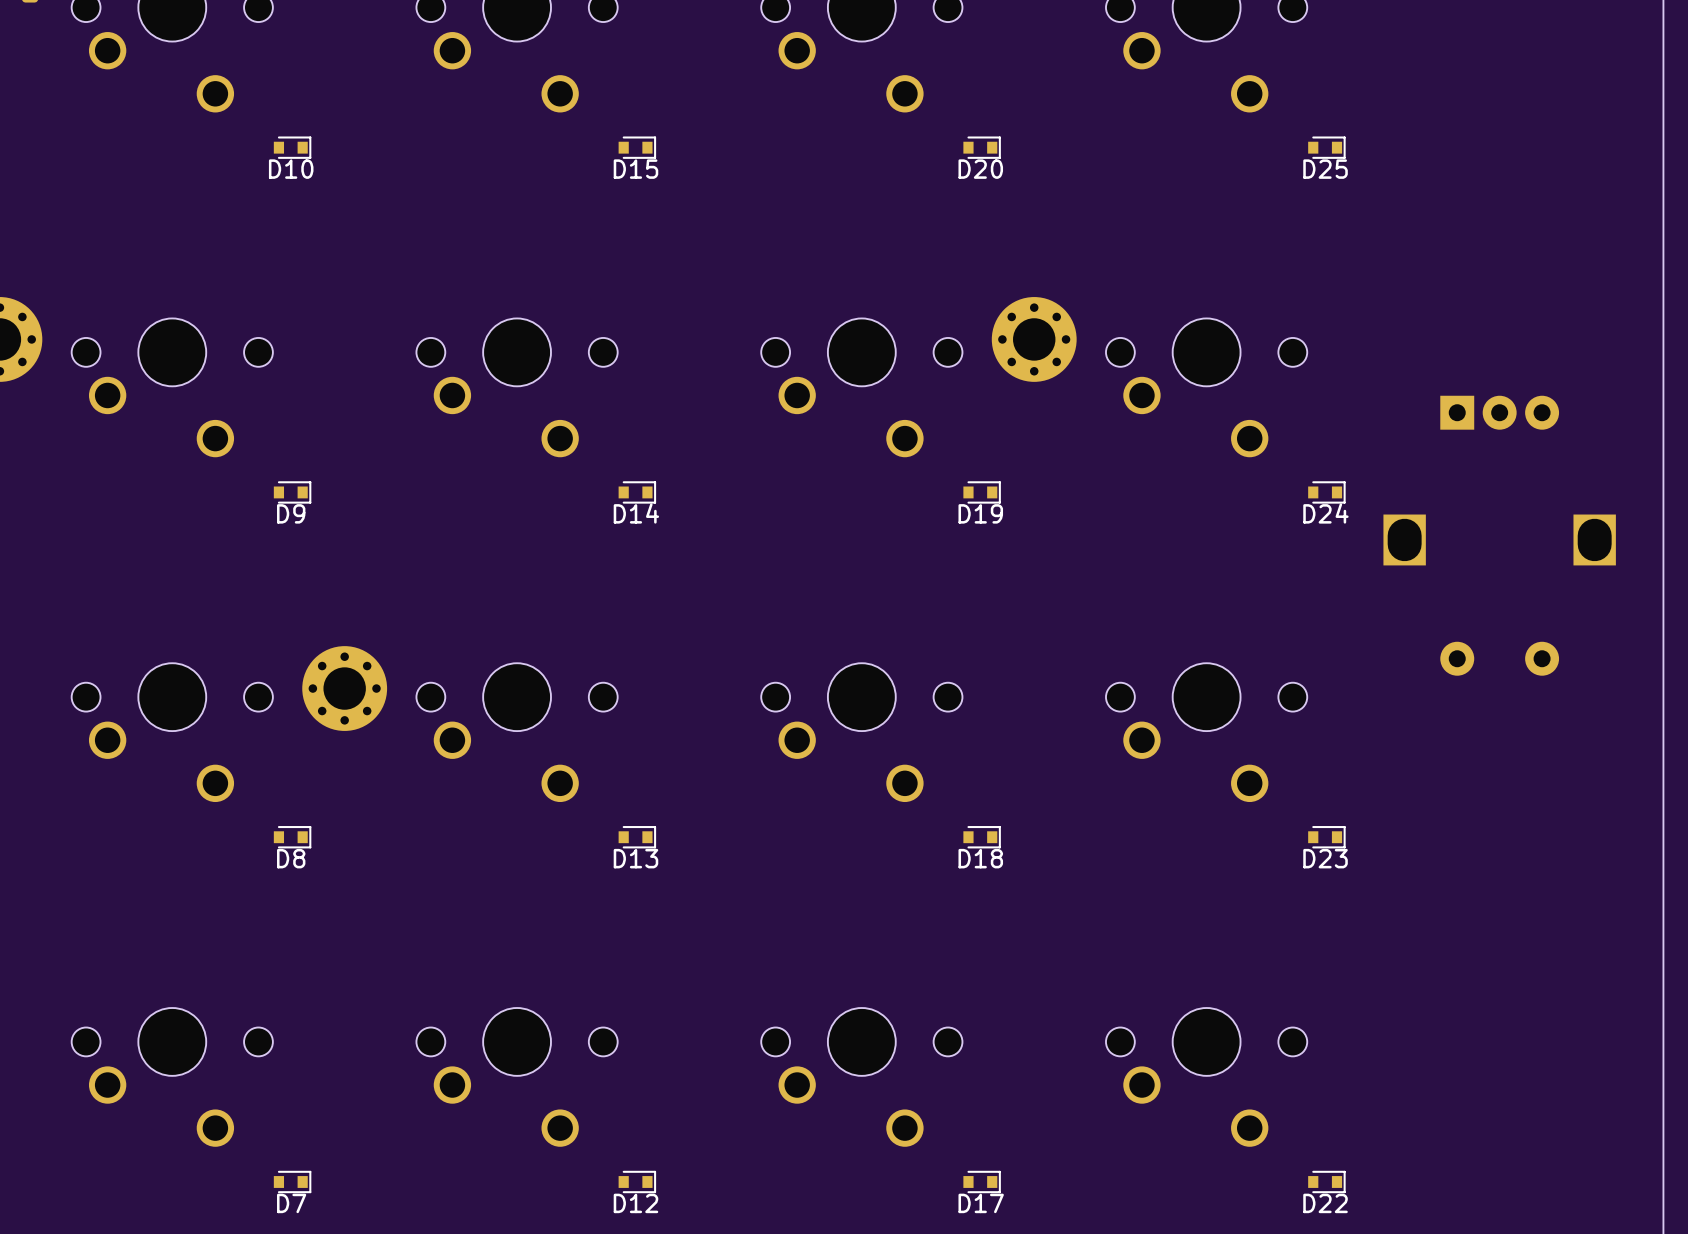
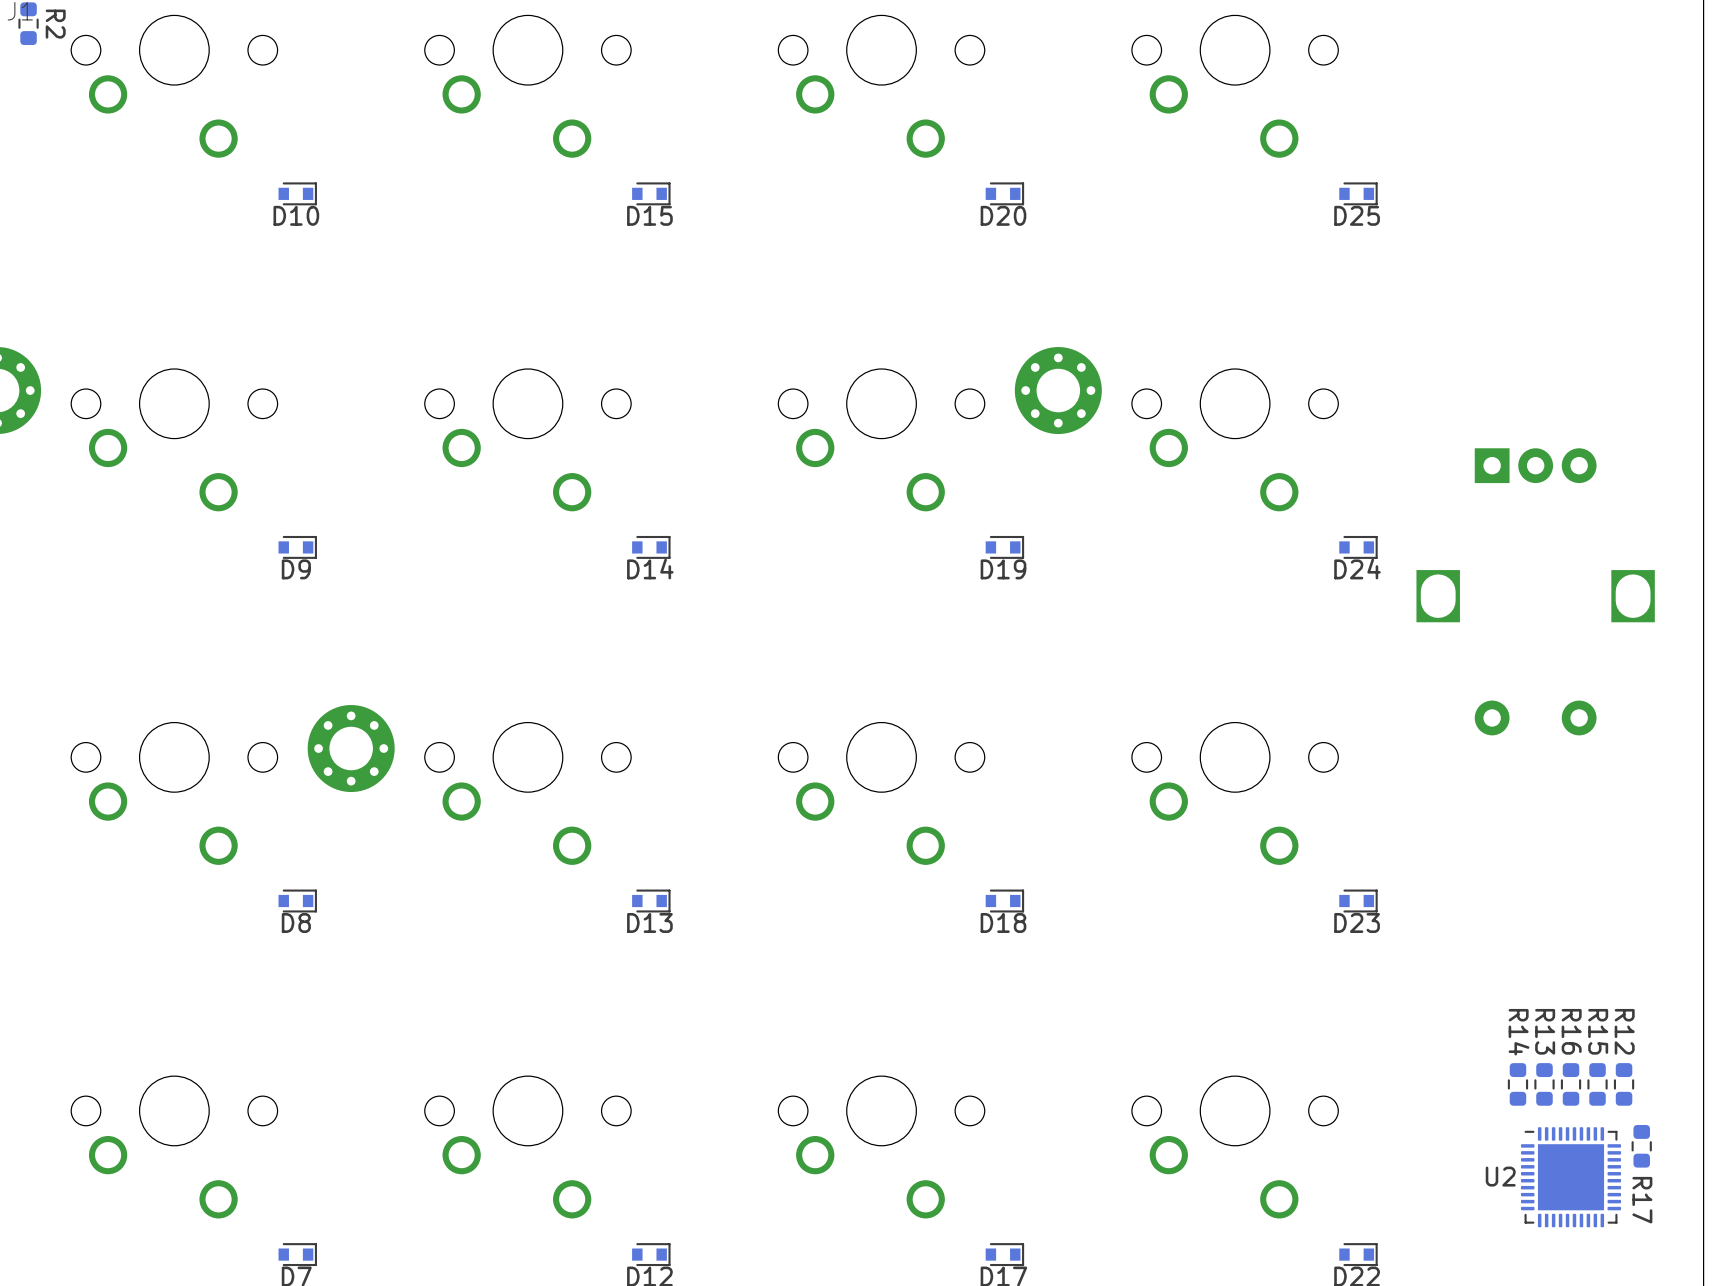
R14: none -> (1517, 1084)
R13: none -> (1544, 1084)
R16: none -> (1571, 1084)
R15: none -> (1597, 1084)
R12: none -> (1624, 1084)
R17: none -> (1641, 1146)
U2: none -> (1571, 1177)

